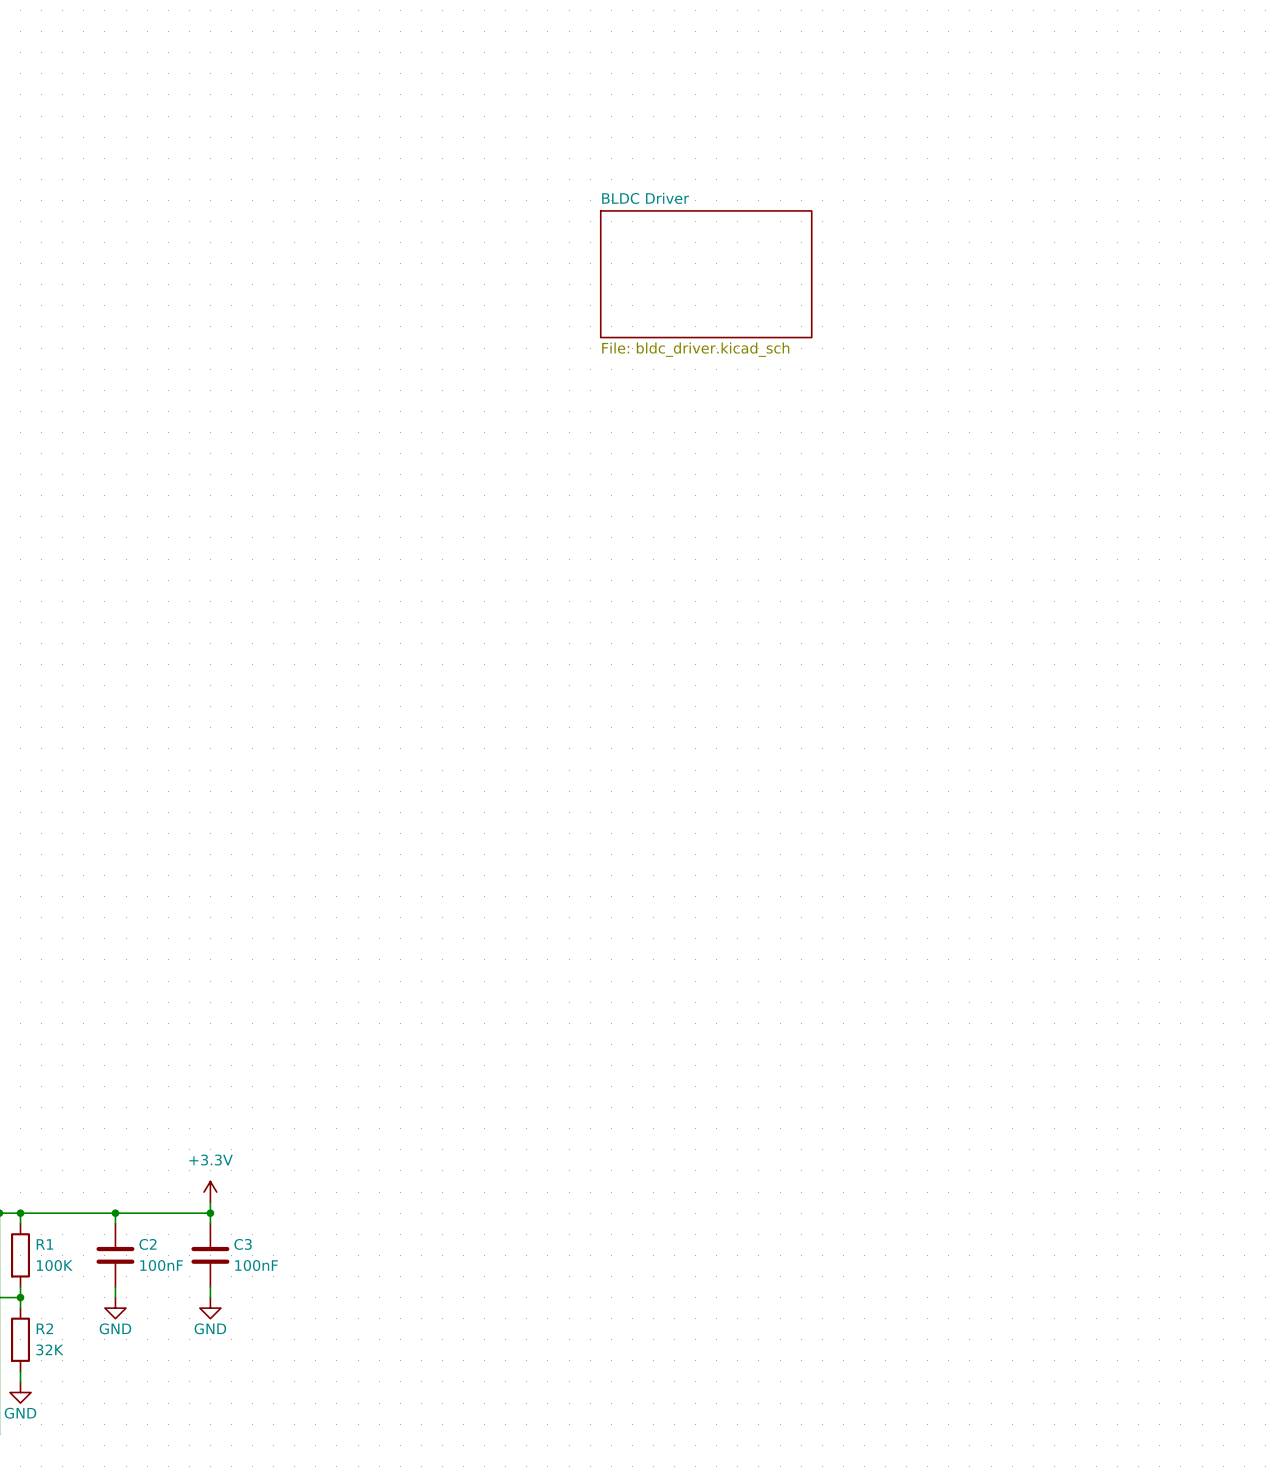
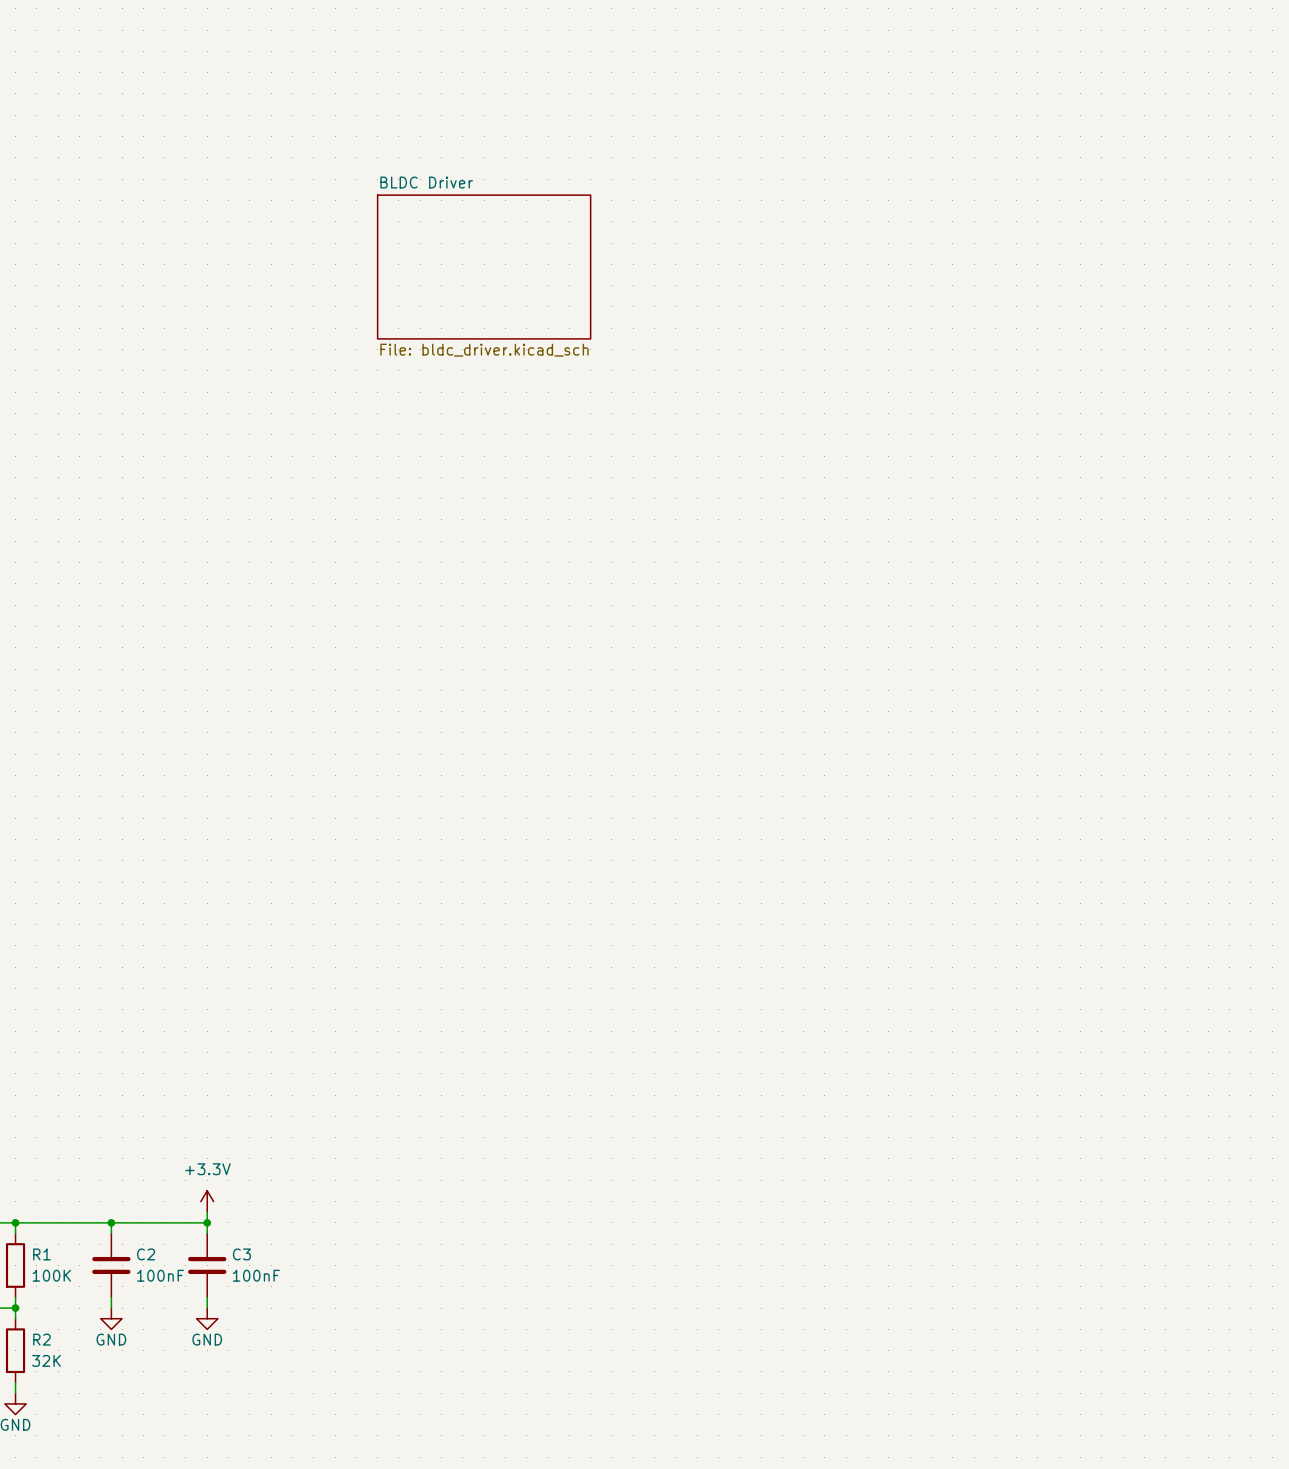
sheet BLDC Driver: none -> File: bldc_driver.kicad_sch (484, 267)
sheet BLDC Driver: File: bldc_driver.kicad_sch (706, 274) -> none

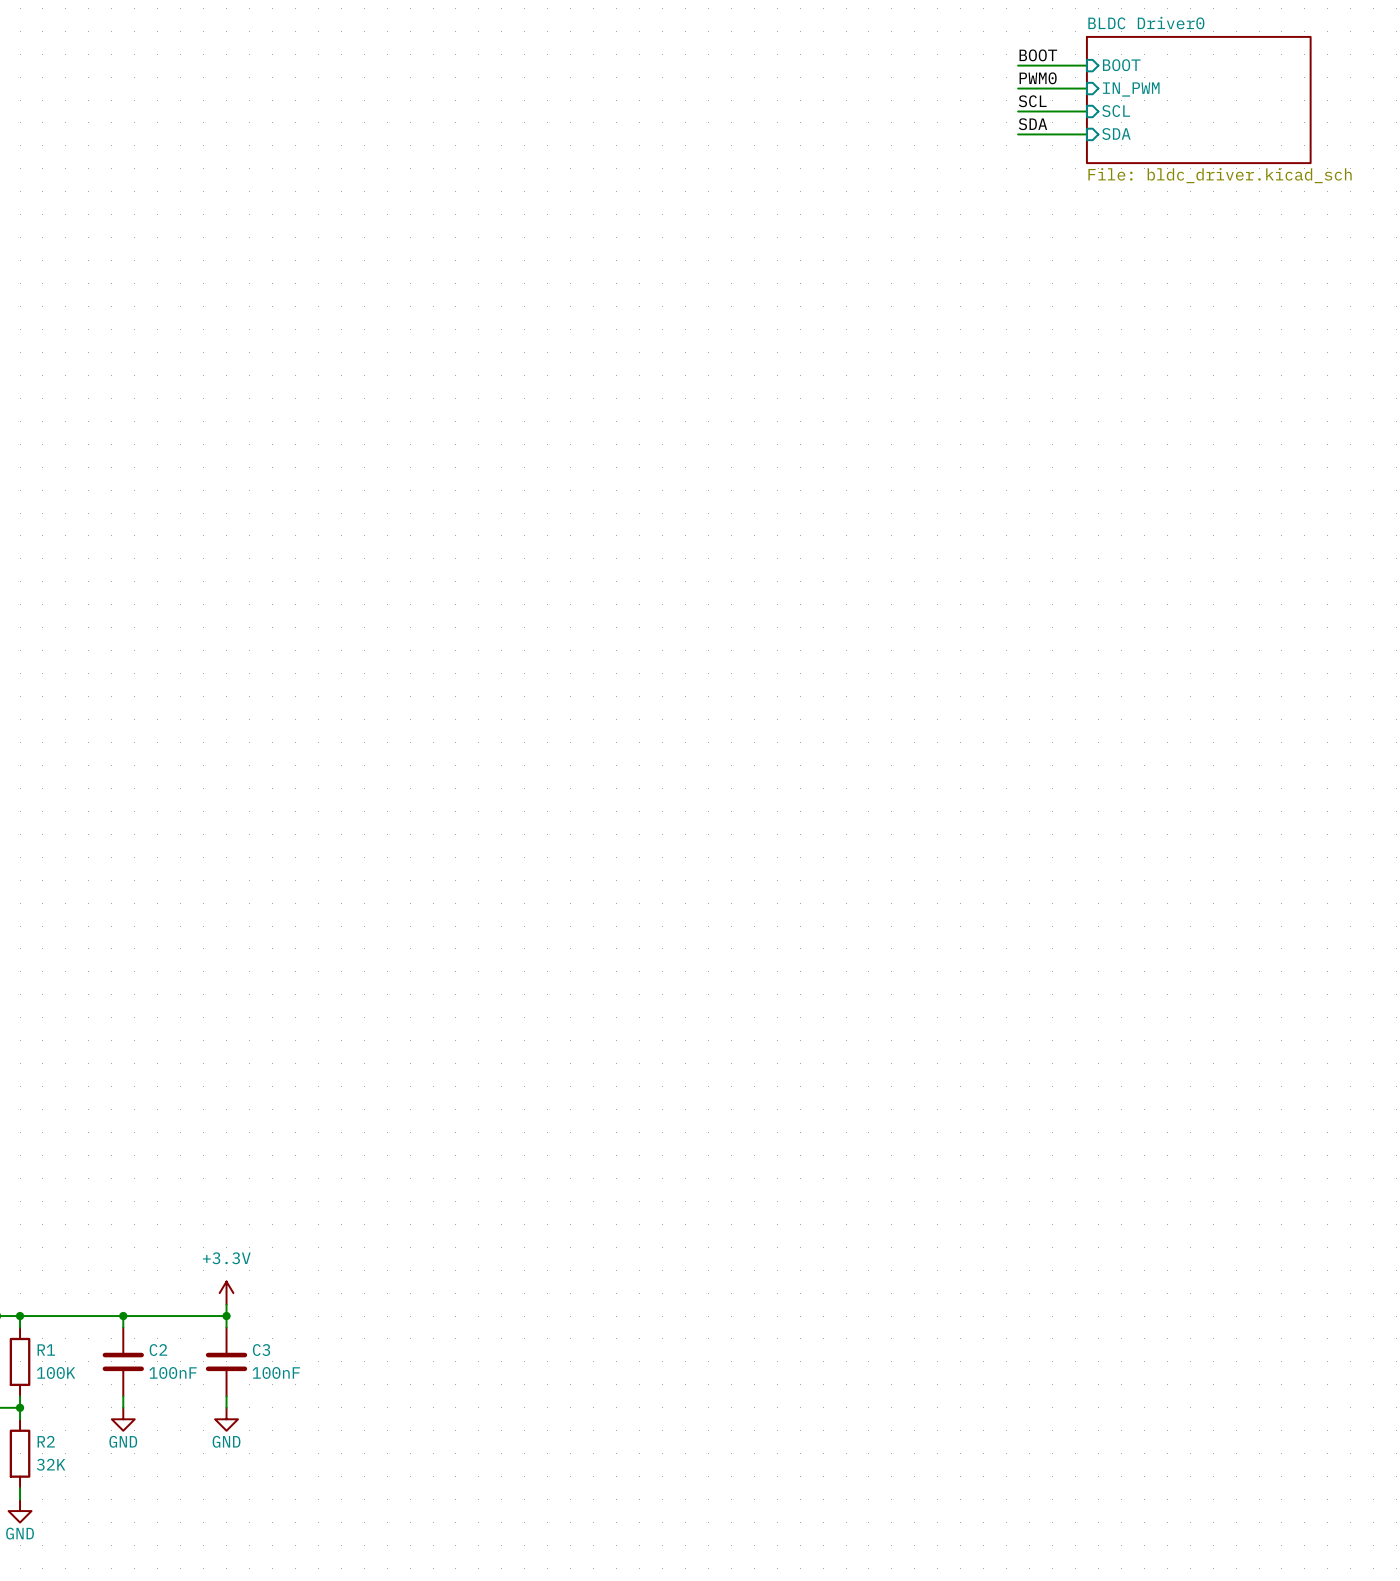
label: none -> BOOT (1038, 55)
sheet pin: none -> BOOT (1121, 65)
wire: none -> (1018, 65) (1086, 65)
label: none -> PWM0 (1038, 78)
wire: none -> (1018, 88) (1086, 88)
sheet pin: none -> IN_PWM (1131, 89)
sheet BLDC Driver0: none -> File: bldc_driver.kicad_sch (1198, 100)
label: none -> SCL (1032, 101)
wire: none -> (1018, 111) (1086, 111)
sheet pin: none -> SCL (1116, 111)
label: none -> SDA (1033, 124)
wire: none -> (1018, 134) (1086, 134)
sheet pin: none -> SDA (1116, 134)
sheet BLDC Driver: File: bldc_driver.kicad_sch (484, 267) -> none

